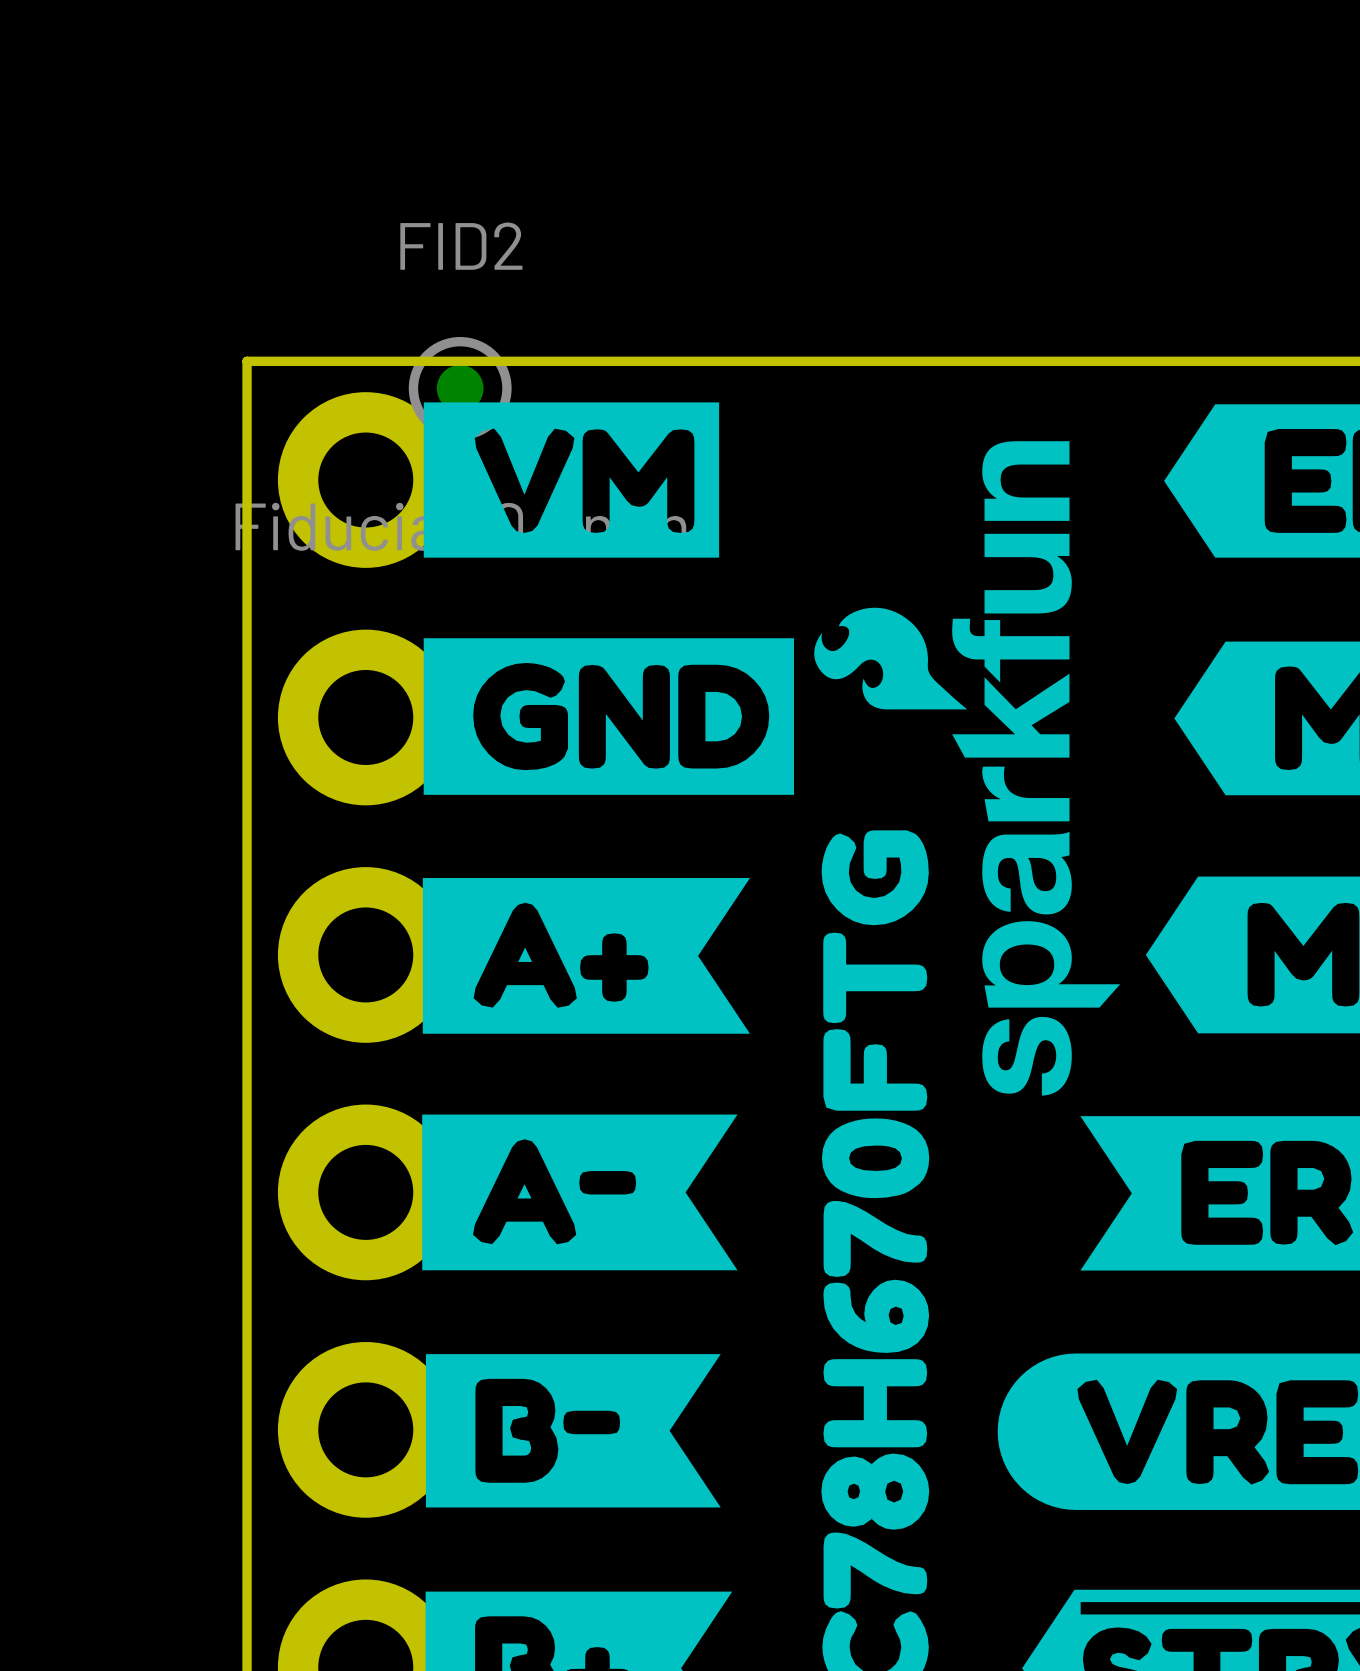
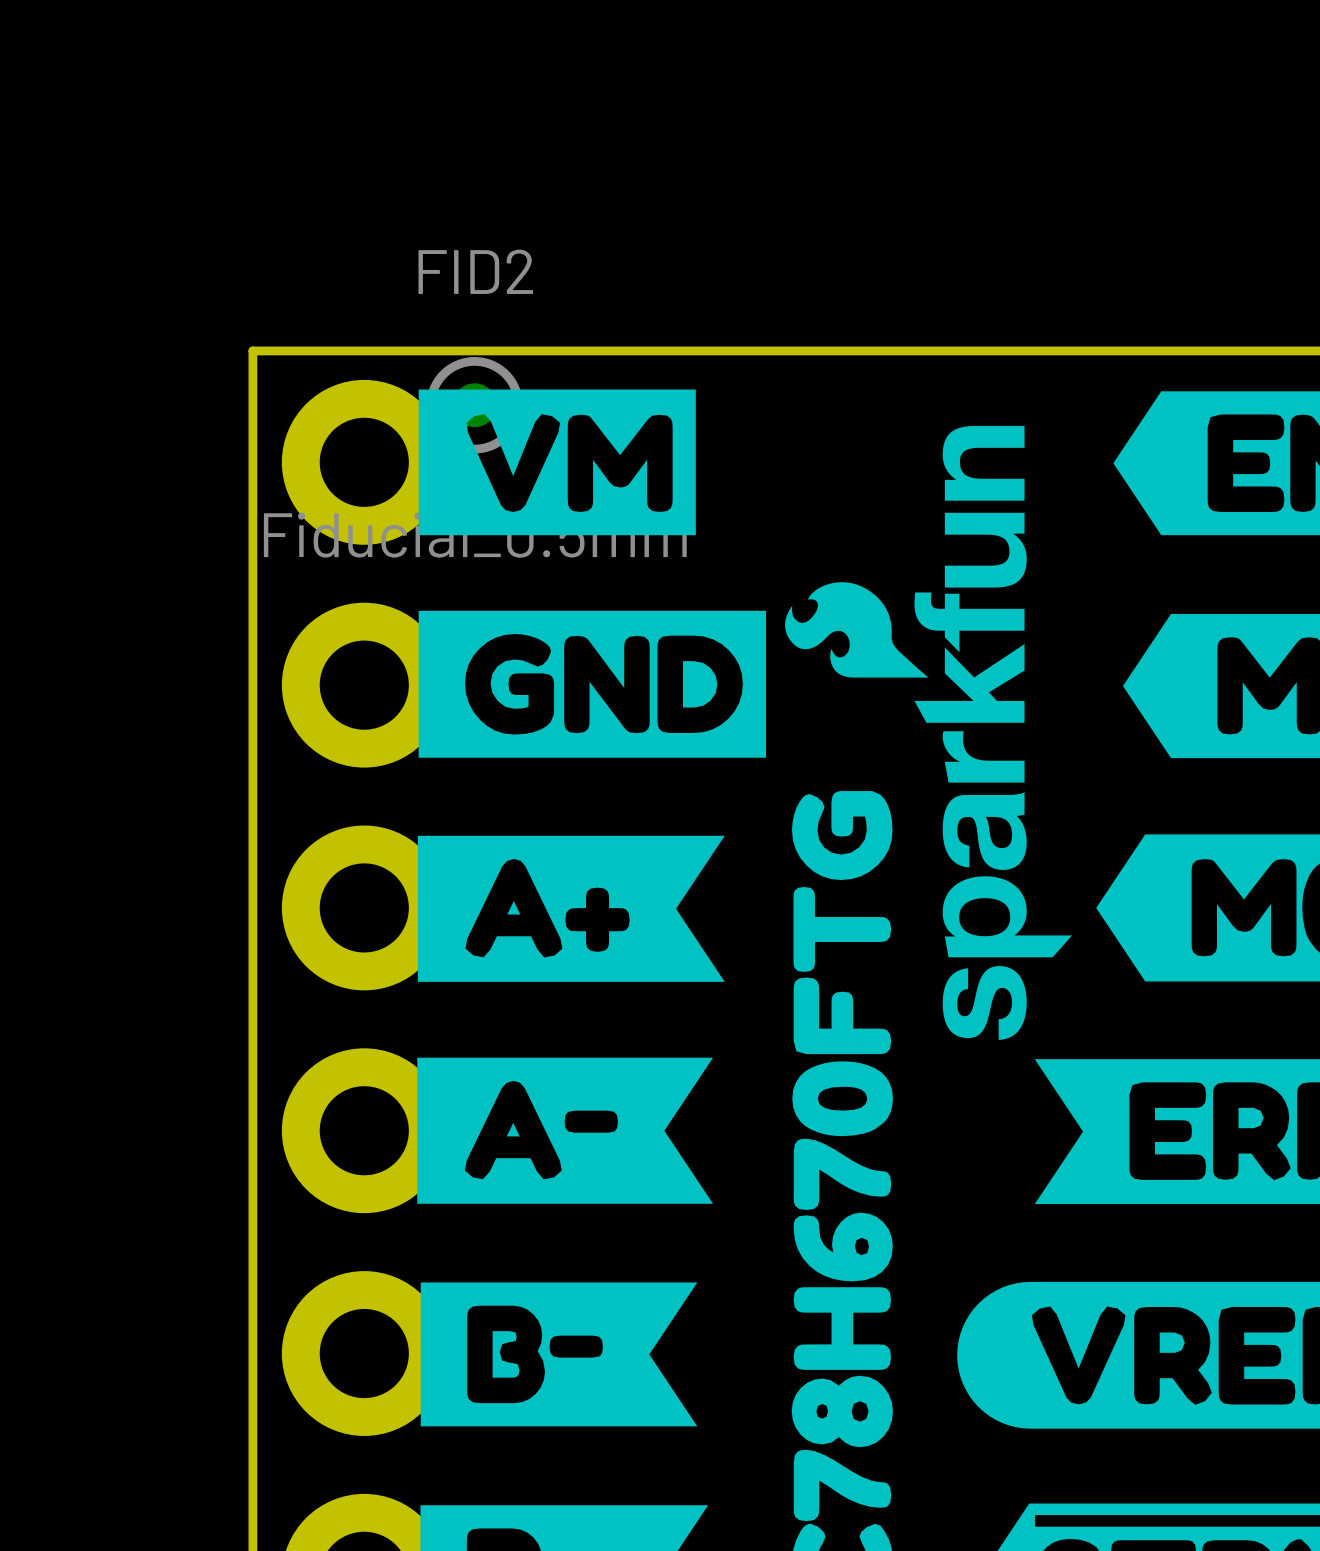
FID2 position: (460, 388) -> (474, 405)

